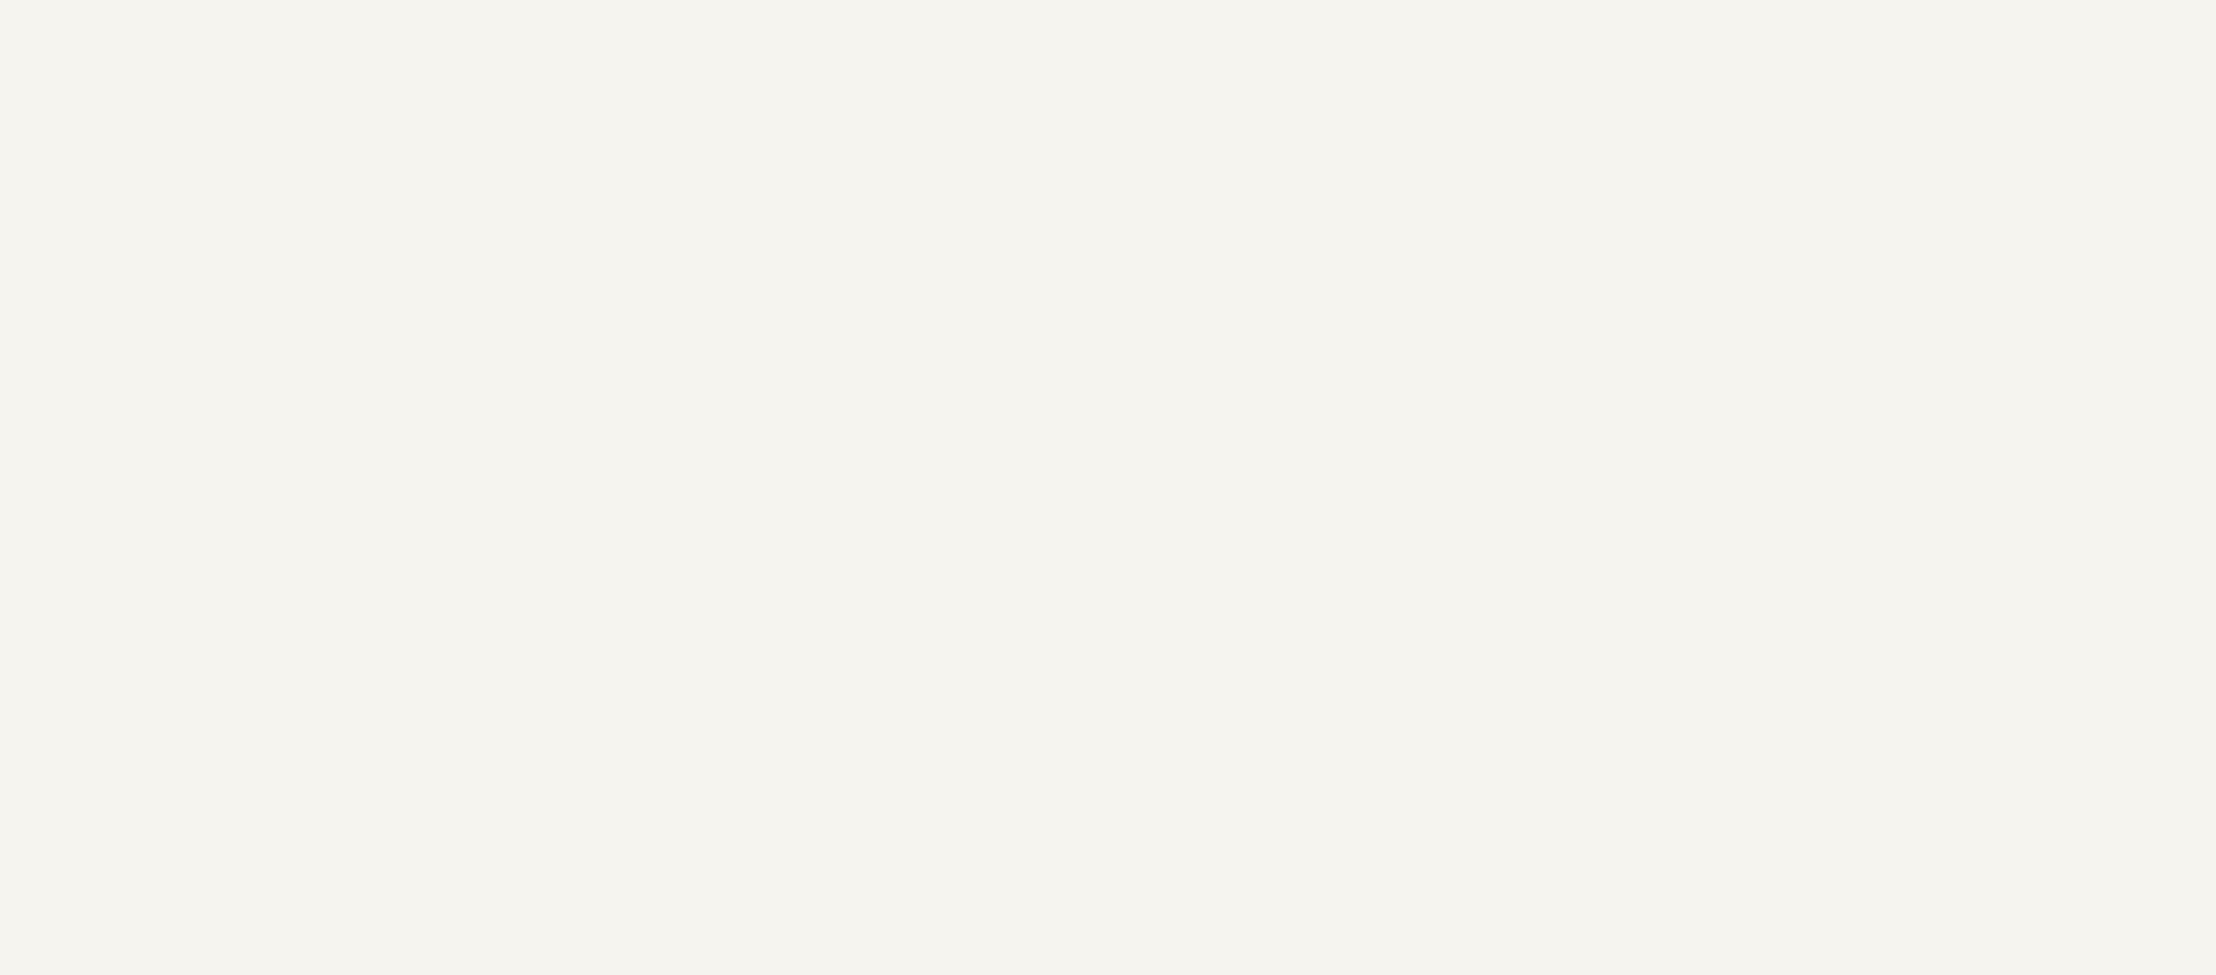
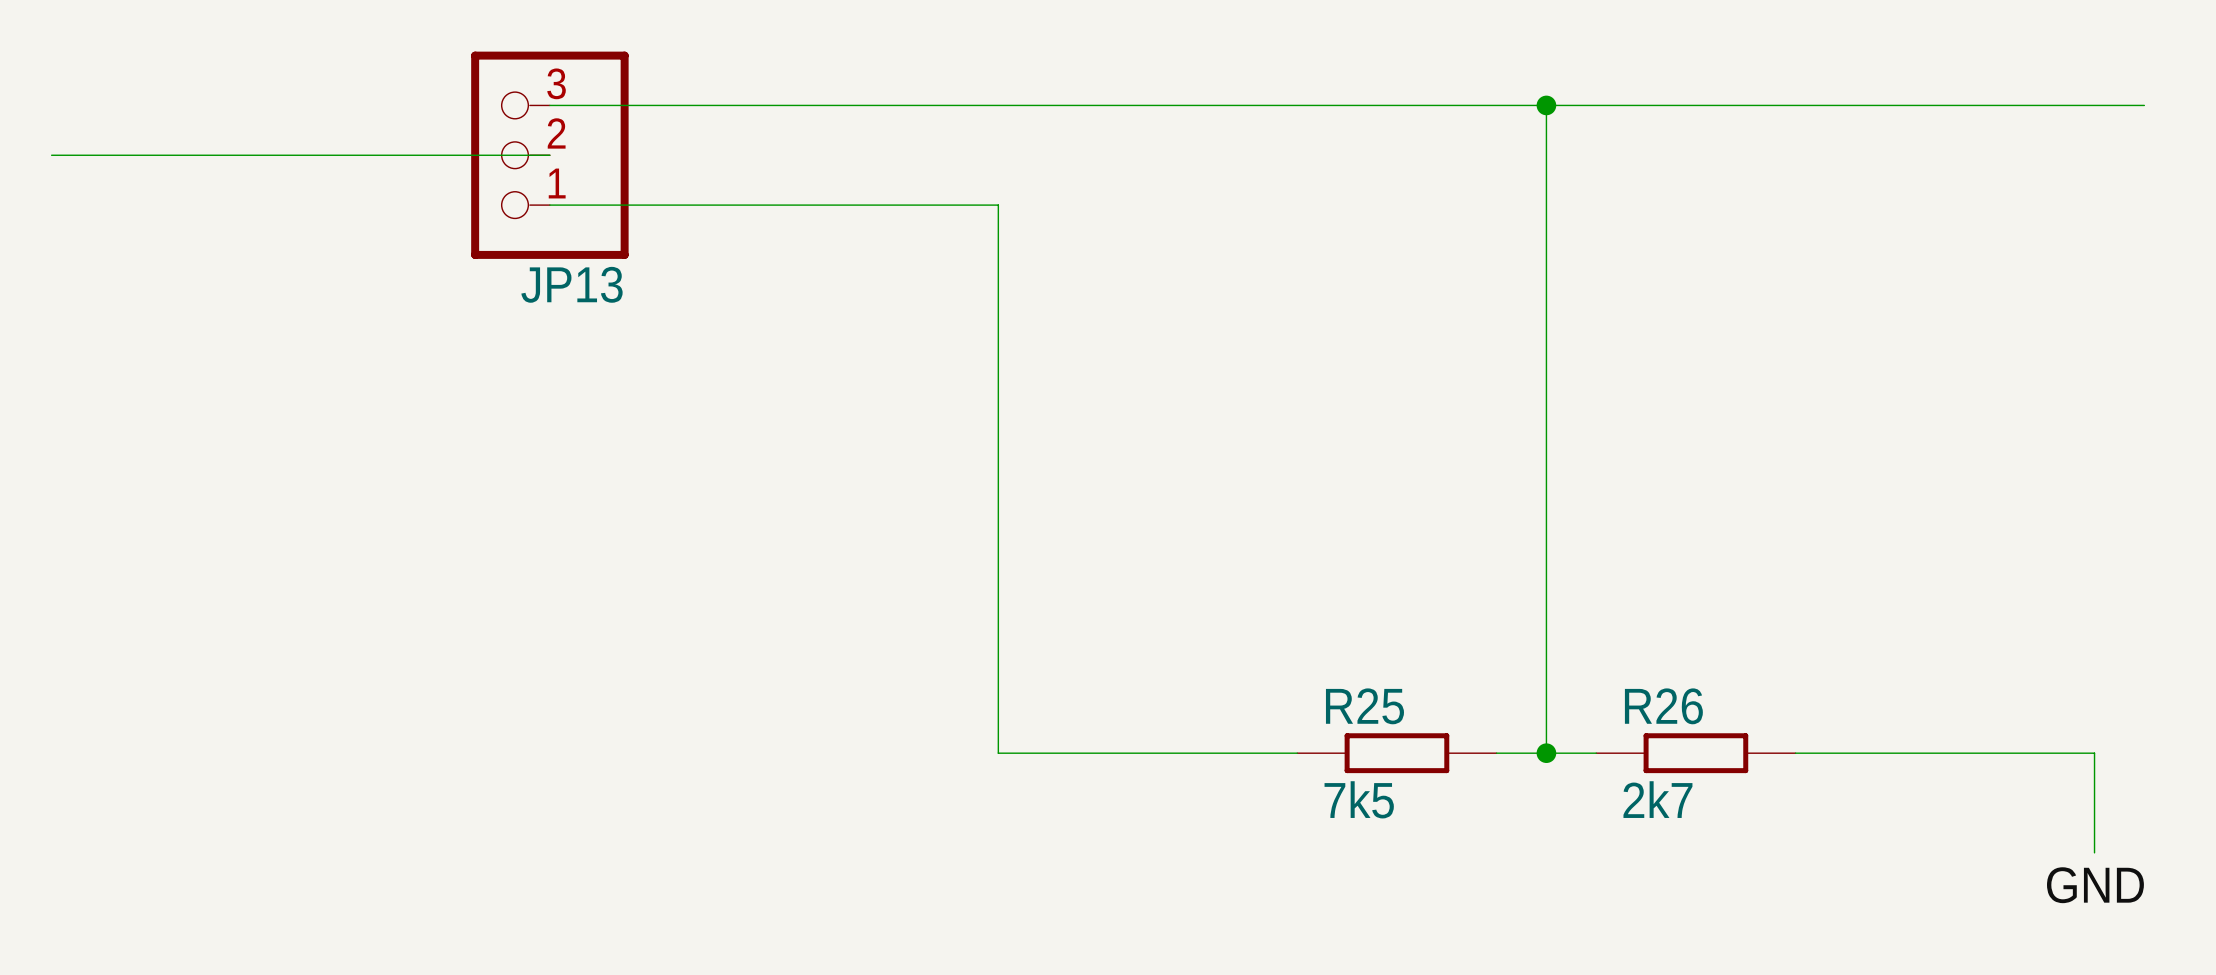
wire: none -> (549, 105) (2144, 105)
wire: none -> (1546, 105) (1546, 753)
junction: none -> (1546, 105)
wire: none -> (51, 155) (549, 155)
JP13: none -> (549, 155)
wire: none -> (549, 205) (998, 205) (998, 753) (1297, 753)
R25: none -> 7k5 (1396, 753)
wire: none -> (1496, 753) (1596, 753)
junction: none -> (1546, 753)
R26: none -> 2k7 (1695, 753)
wire: none -> (1795, 753) (2094, 753) (2094, 852)
label: none -> GND (2095, 885)

